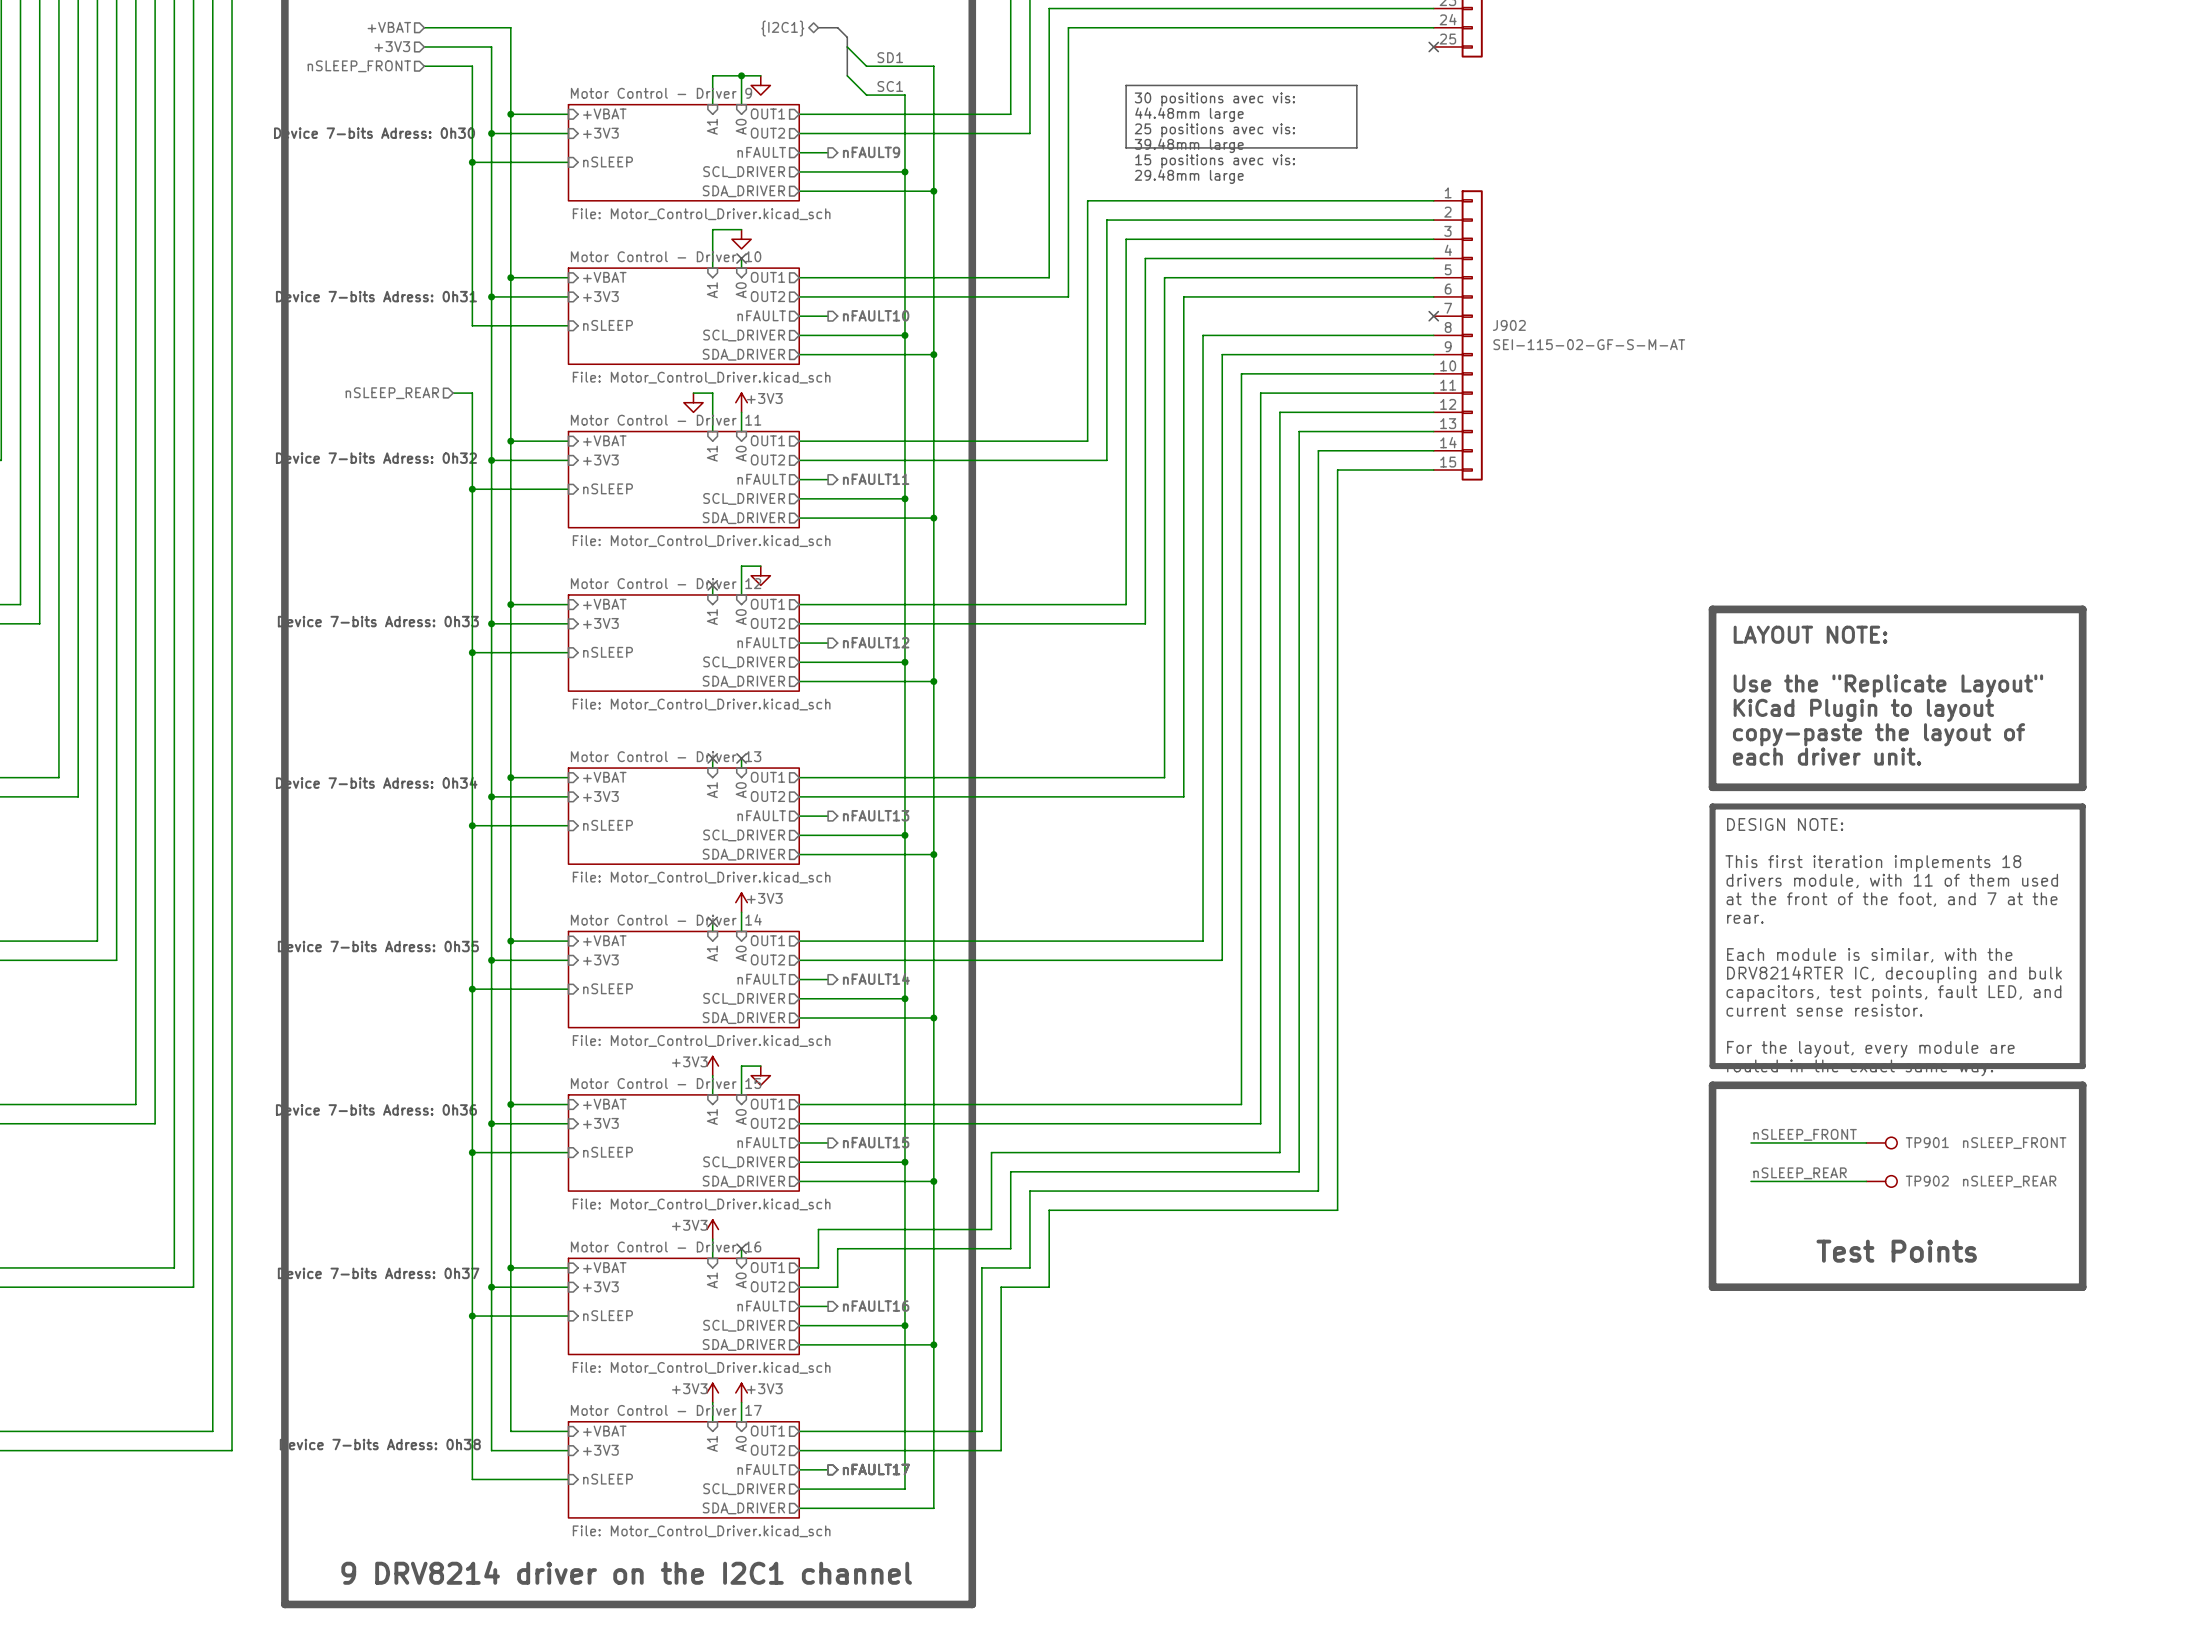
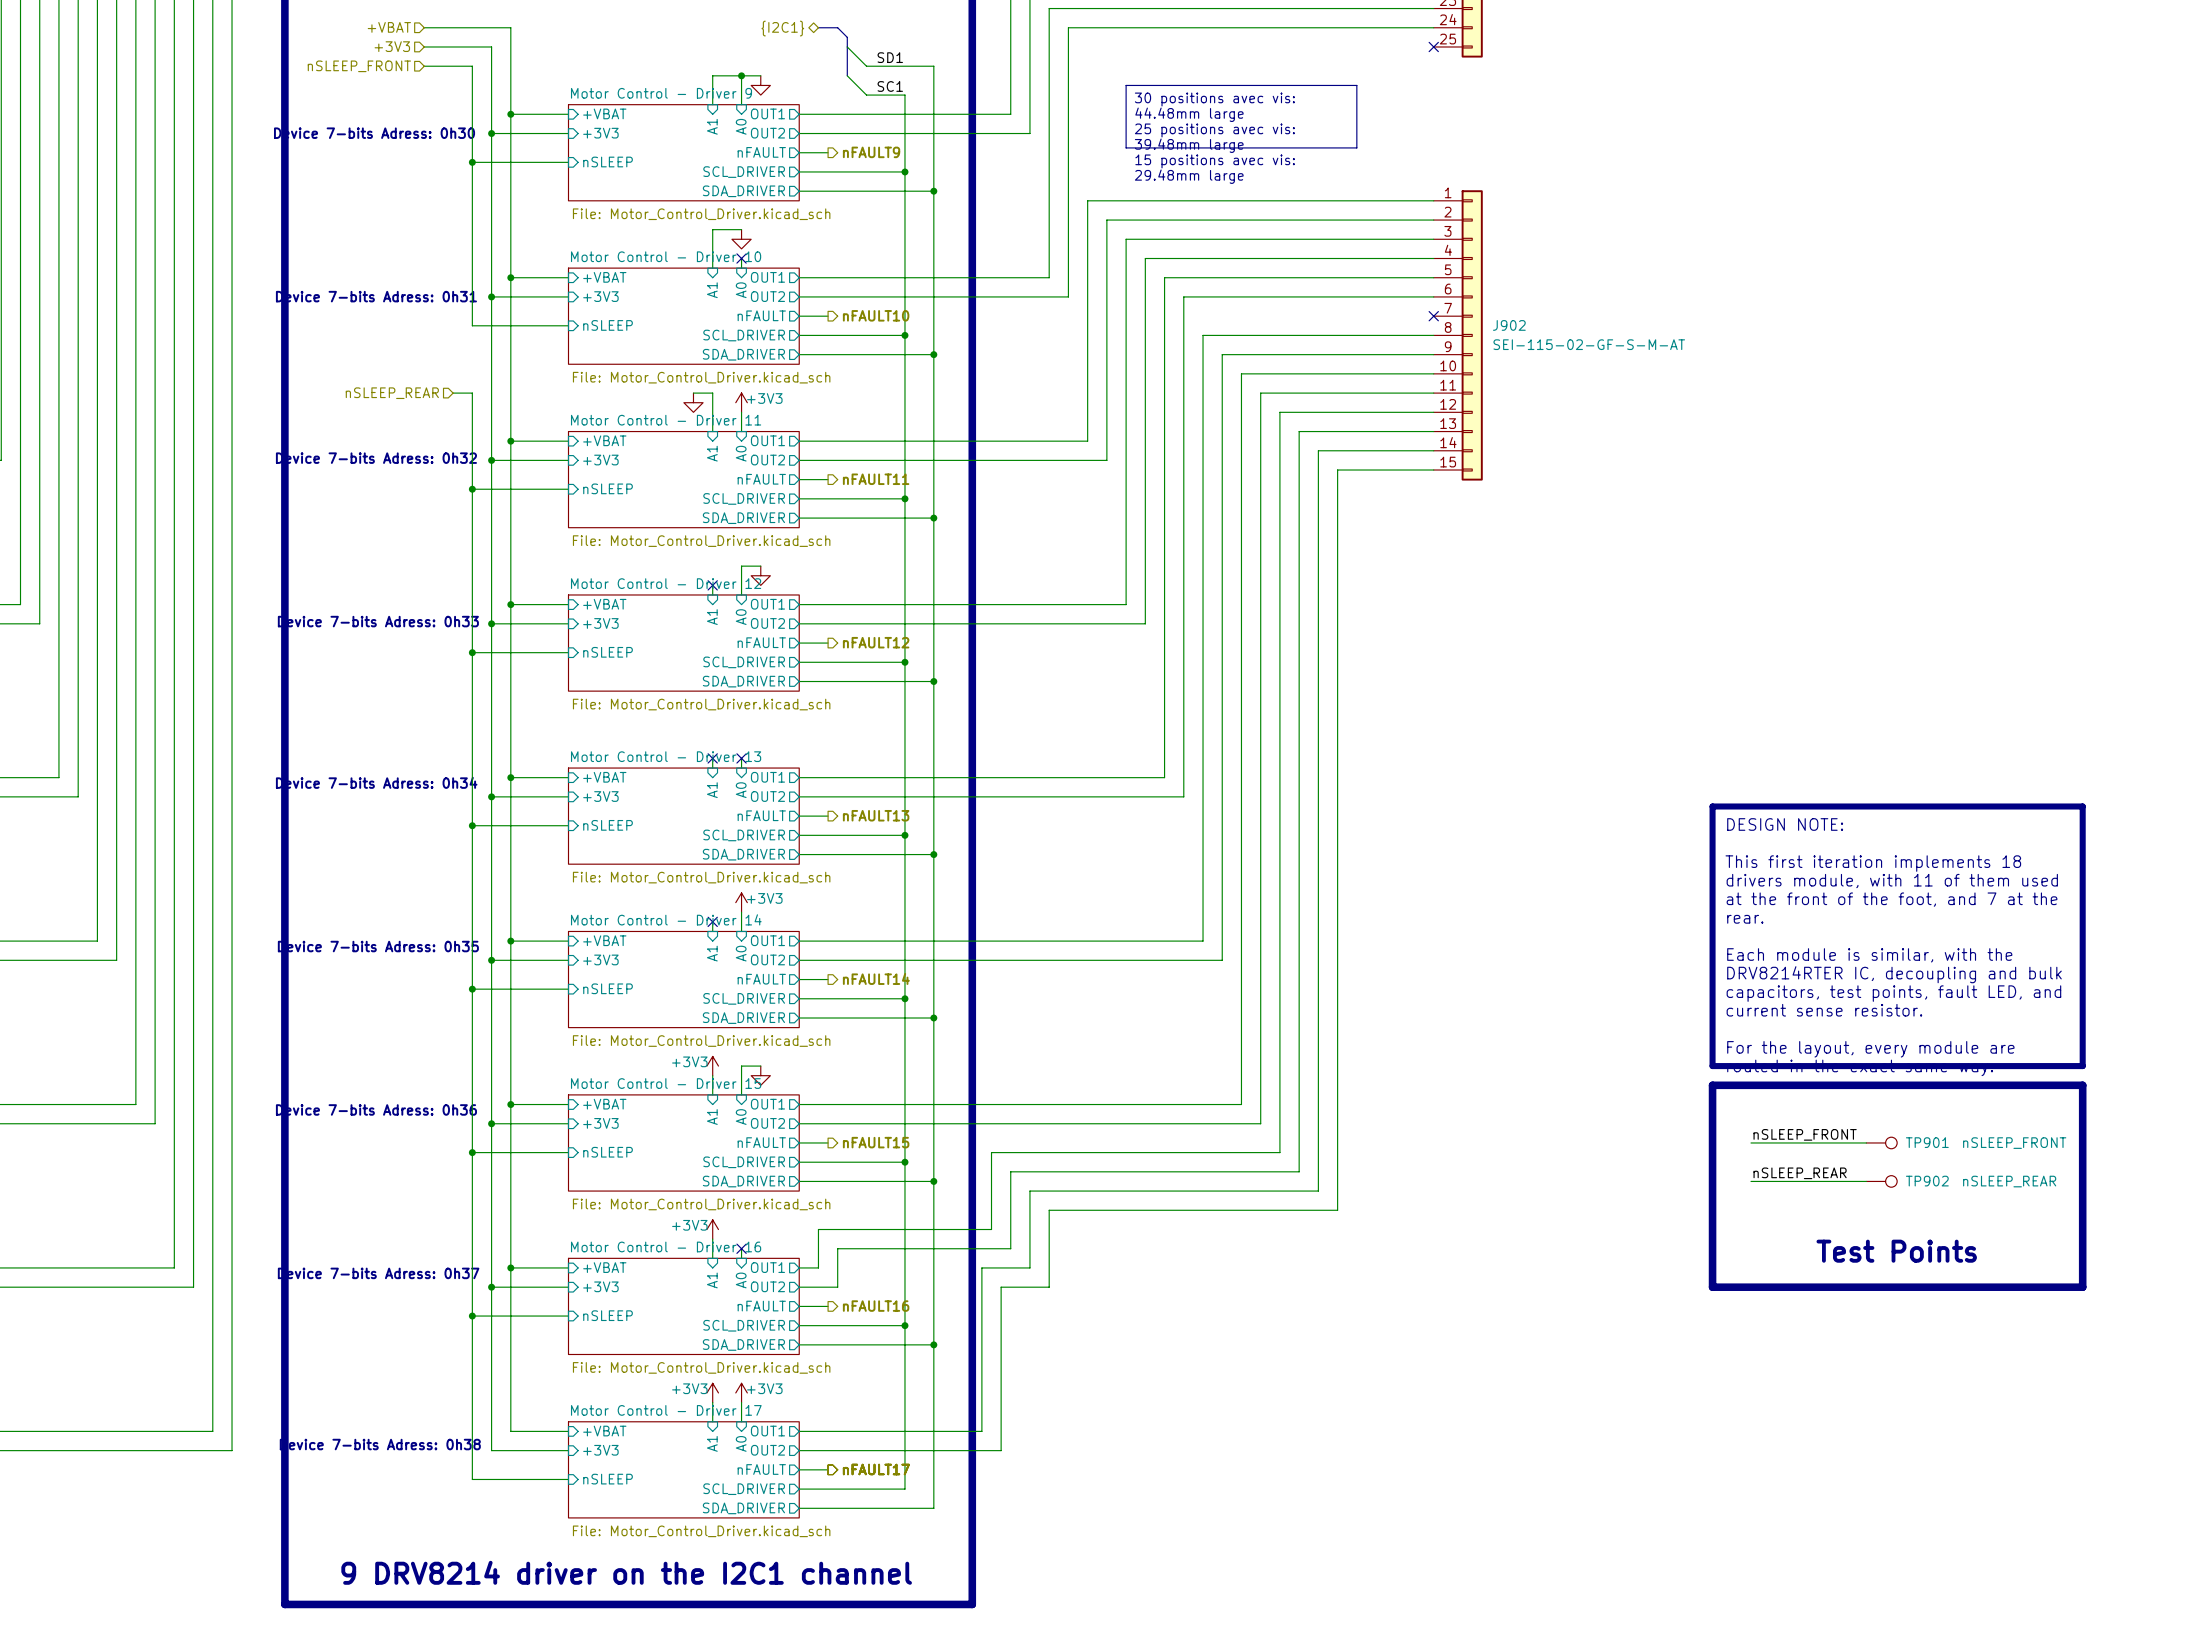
line: (1712, 609) (2082, 609) (2082, 787) (1712, 787) (1712, 609) -> none
text: LAYOUT NOTE: (1810, 634) -> none
text: Use the "Replicate Layout" (1888, 686) -> none
text: KiCad Plugin to layout (1863, 710) -> none
text: copy-paste the layout of (1879, 734) -> none
text: each driver unit. (1827, 756) -> none

